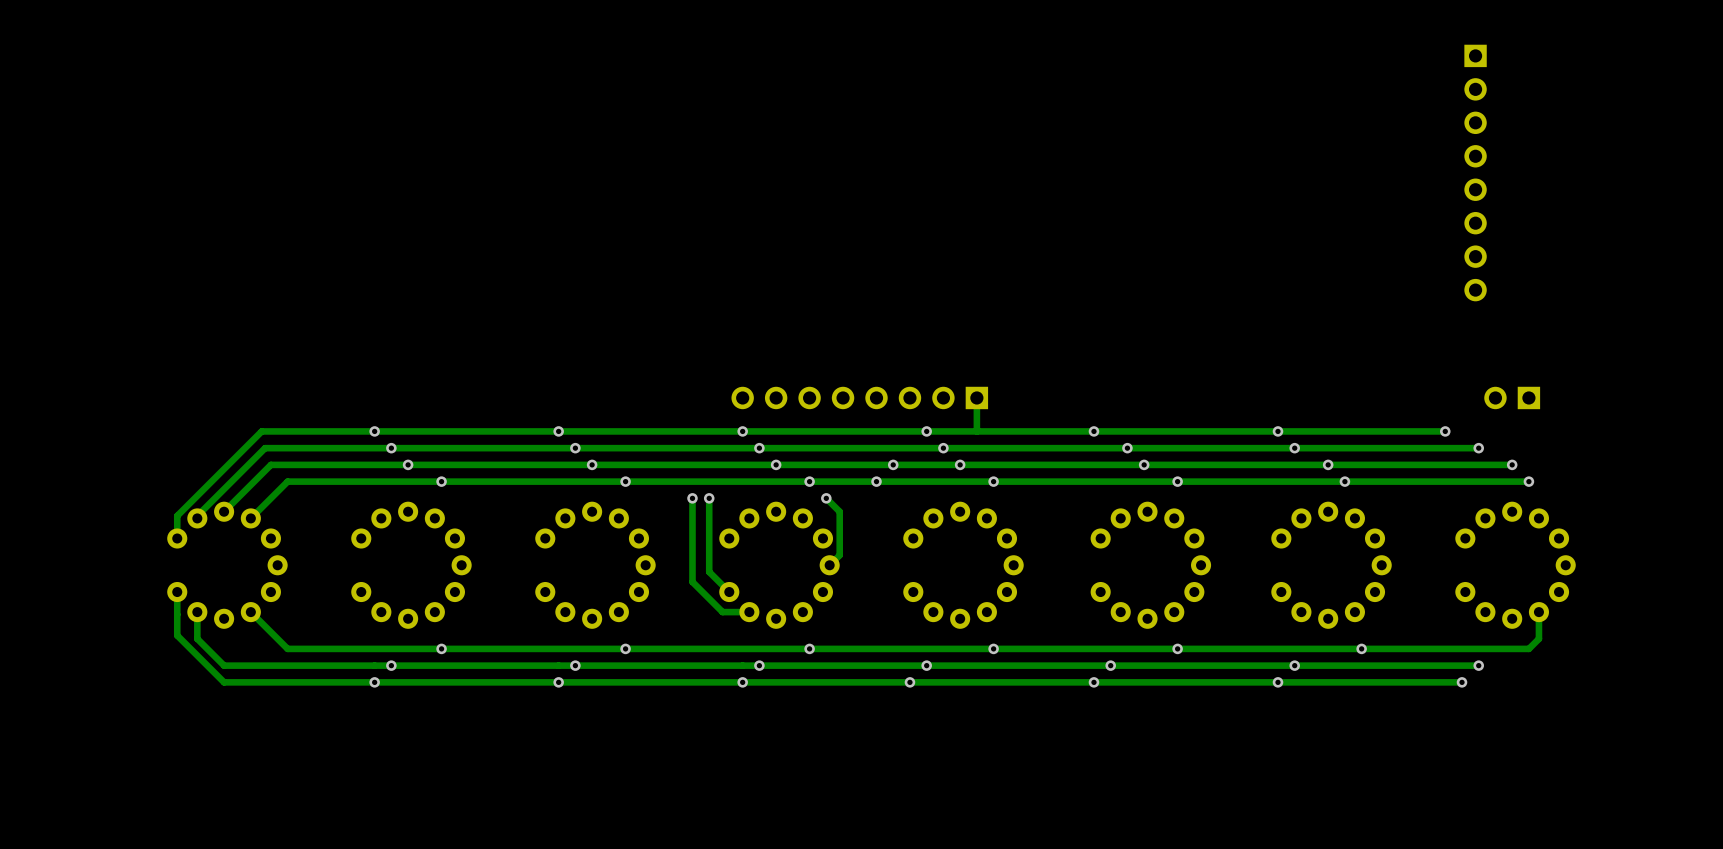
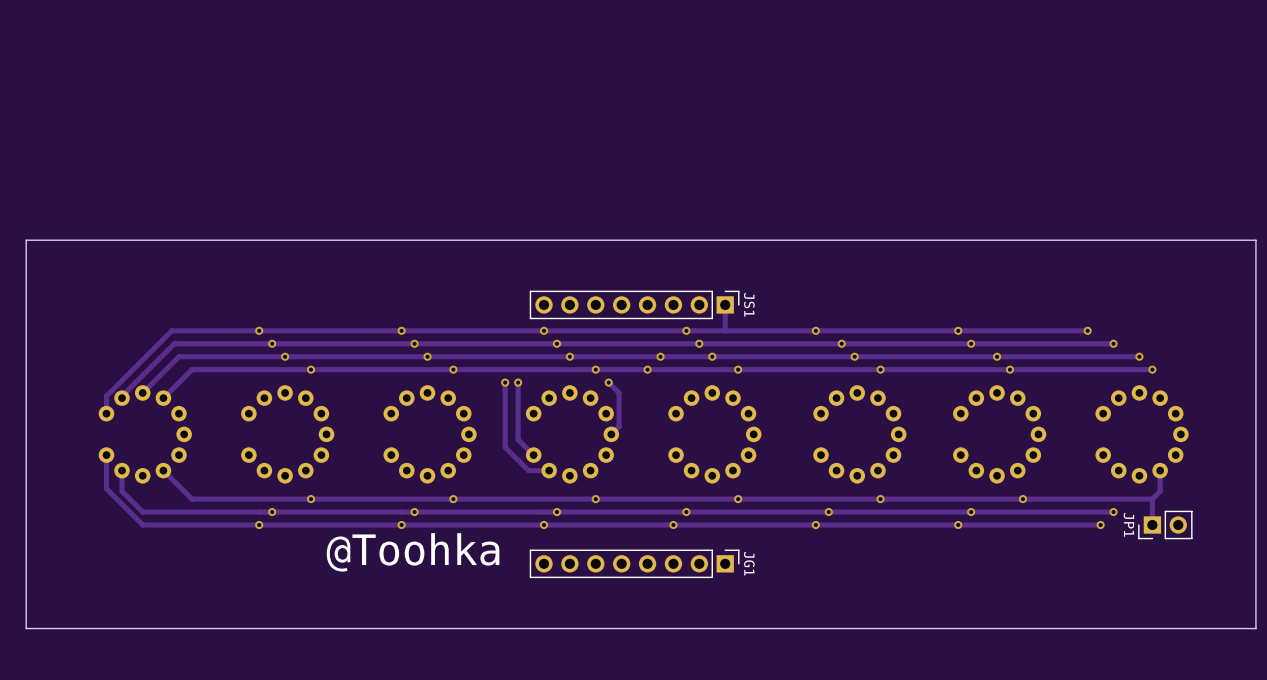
part: (1475, 173) -> none
board edge: none -> (1255, 240) (26, 240) (26, 628) (1255, 628) (1255, 240)
JS1 side: top (859, 397) -> bottom (634, 304)
JP1 side: top (1512, 397) -> bottom (1165, 524)
track: none -> (1152, 499) (1152, 524)
text: none -> @Toohka (413, 552)
JG1: none -> (634, 563)

